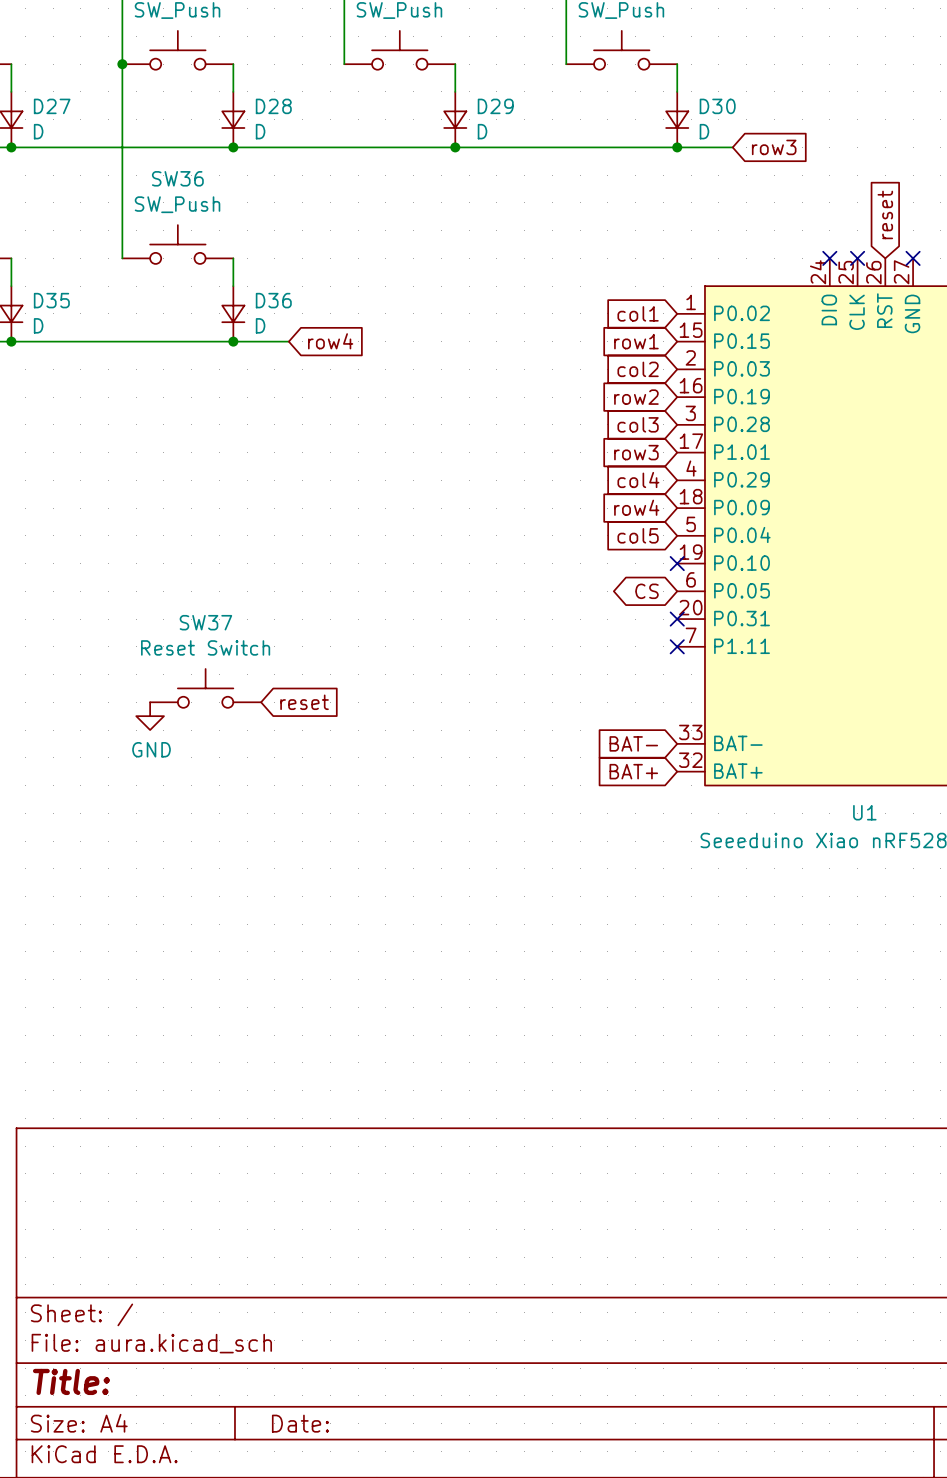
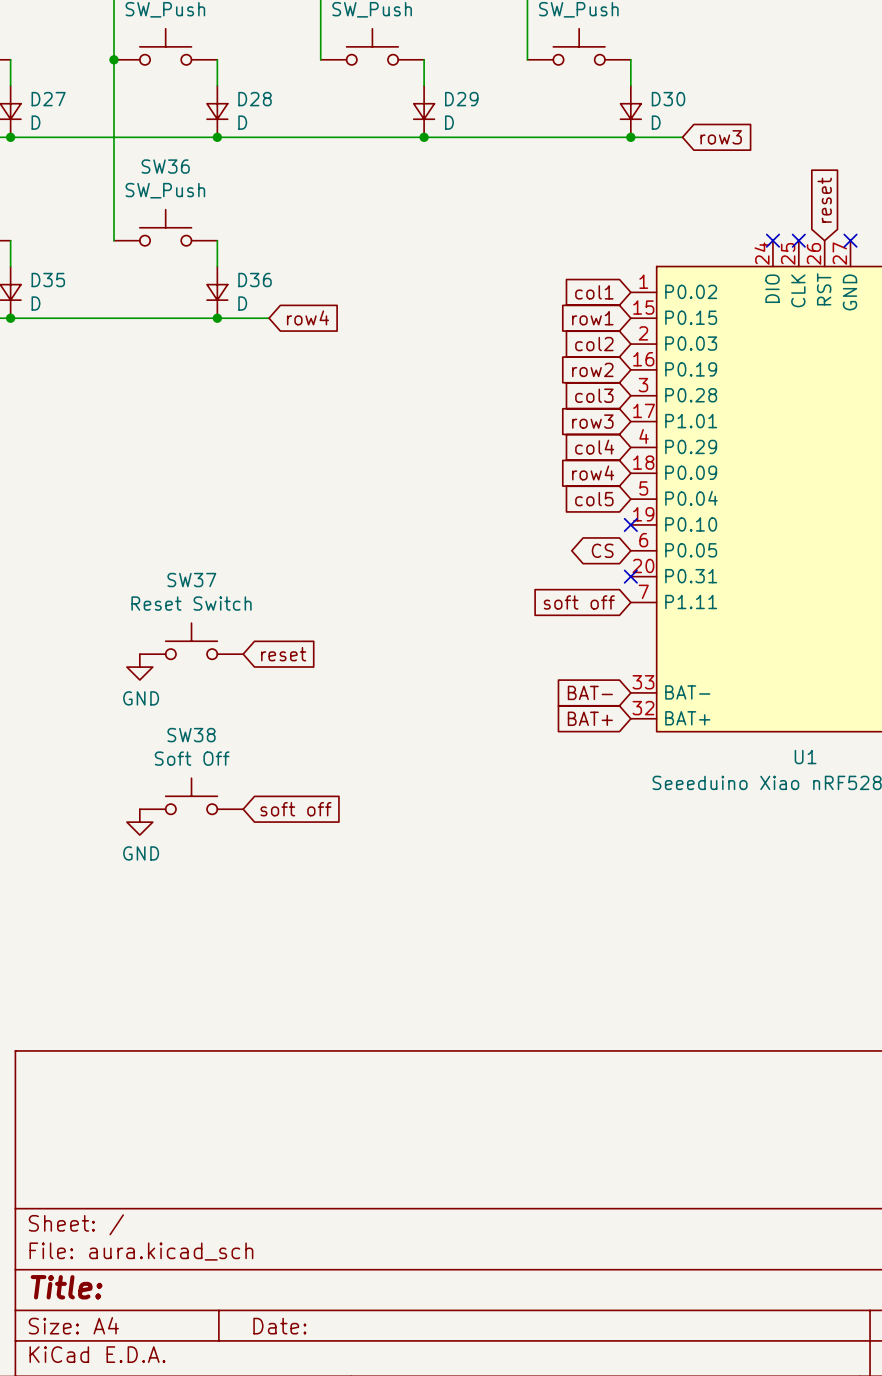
global label: none -> soft off (579, 602)
no-connect mark: (677, 646) -> none
SW38: none -> Soft Off (191, 796)
global label: none -> soft off (295, 809)
power symbol: none -> GND (139, 822)

